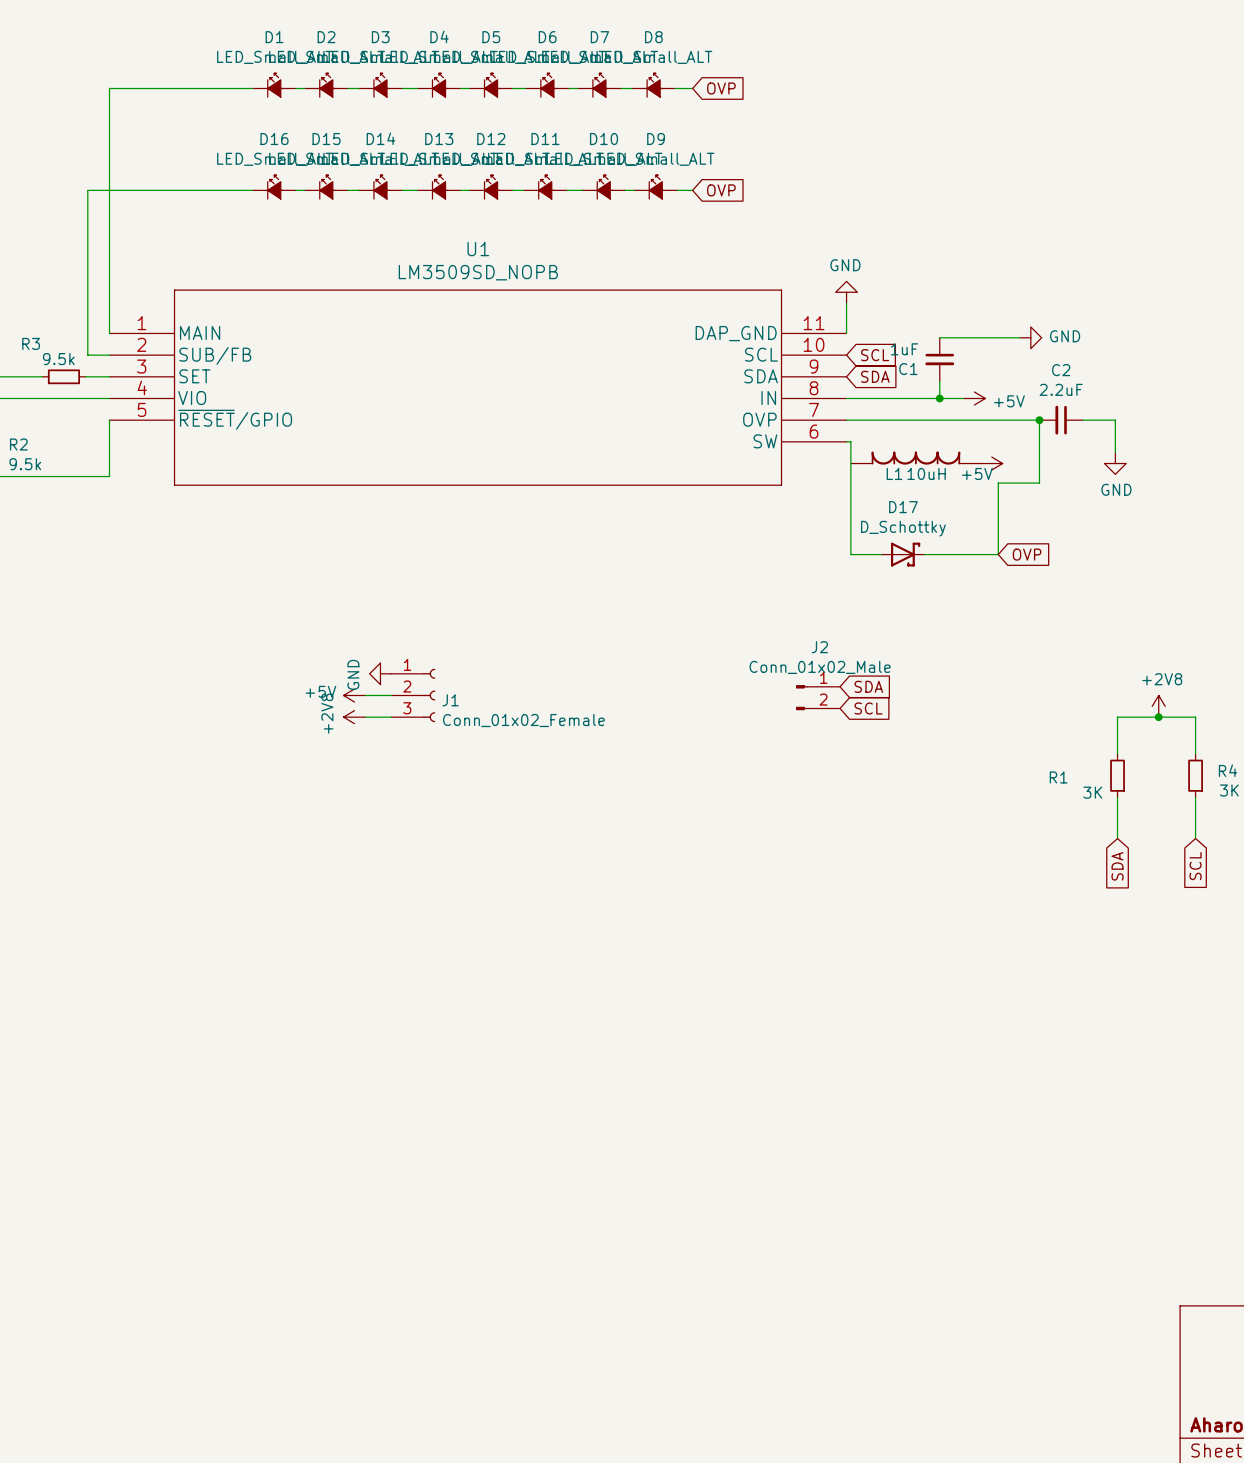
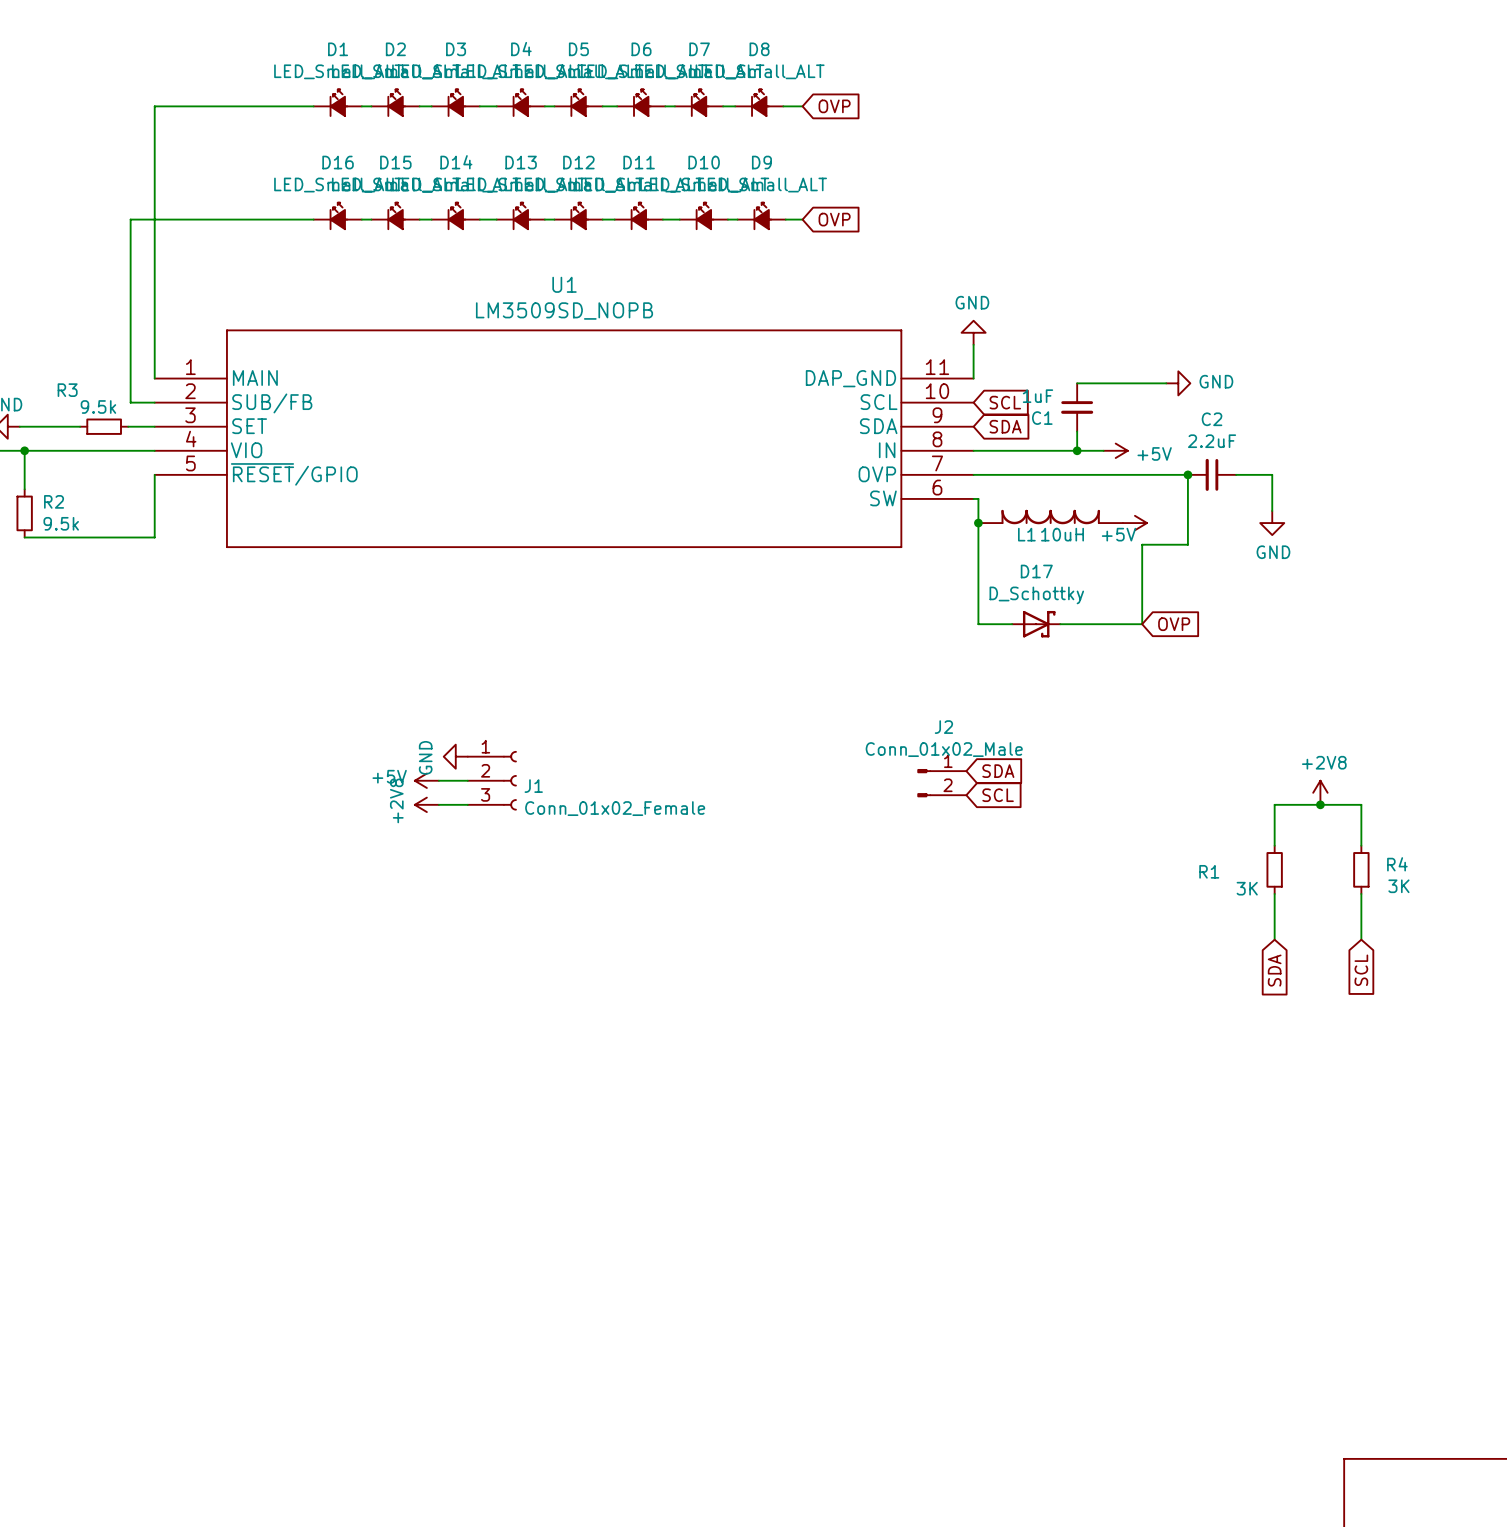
junction: none -> (978, 523)

